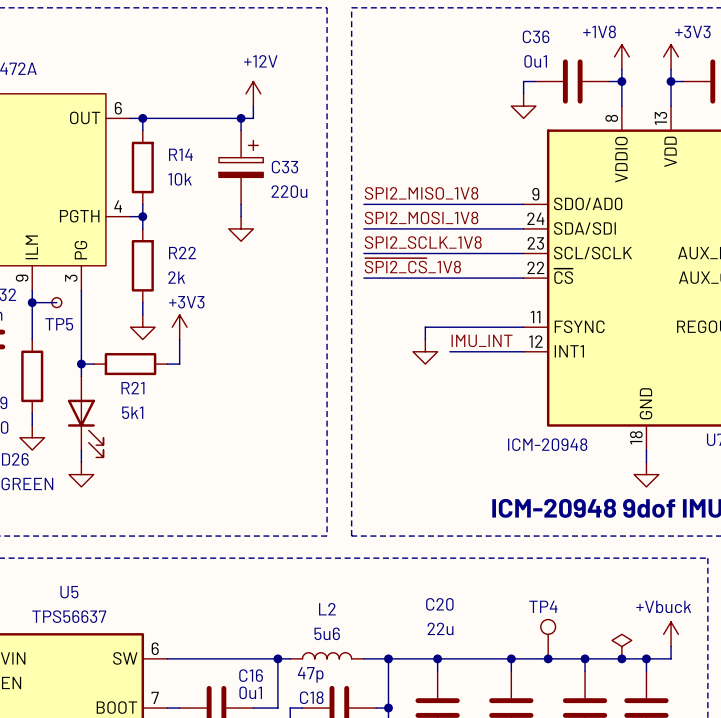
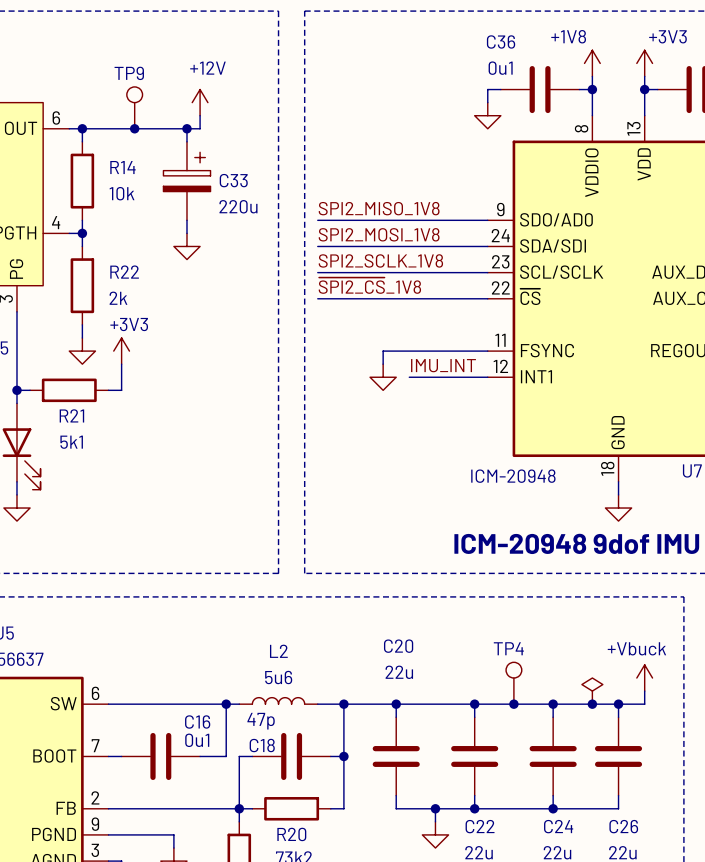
TP9: none -> (134, 107)
junction: none -> (134, 128)

